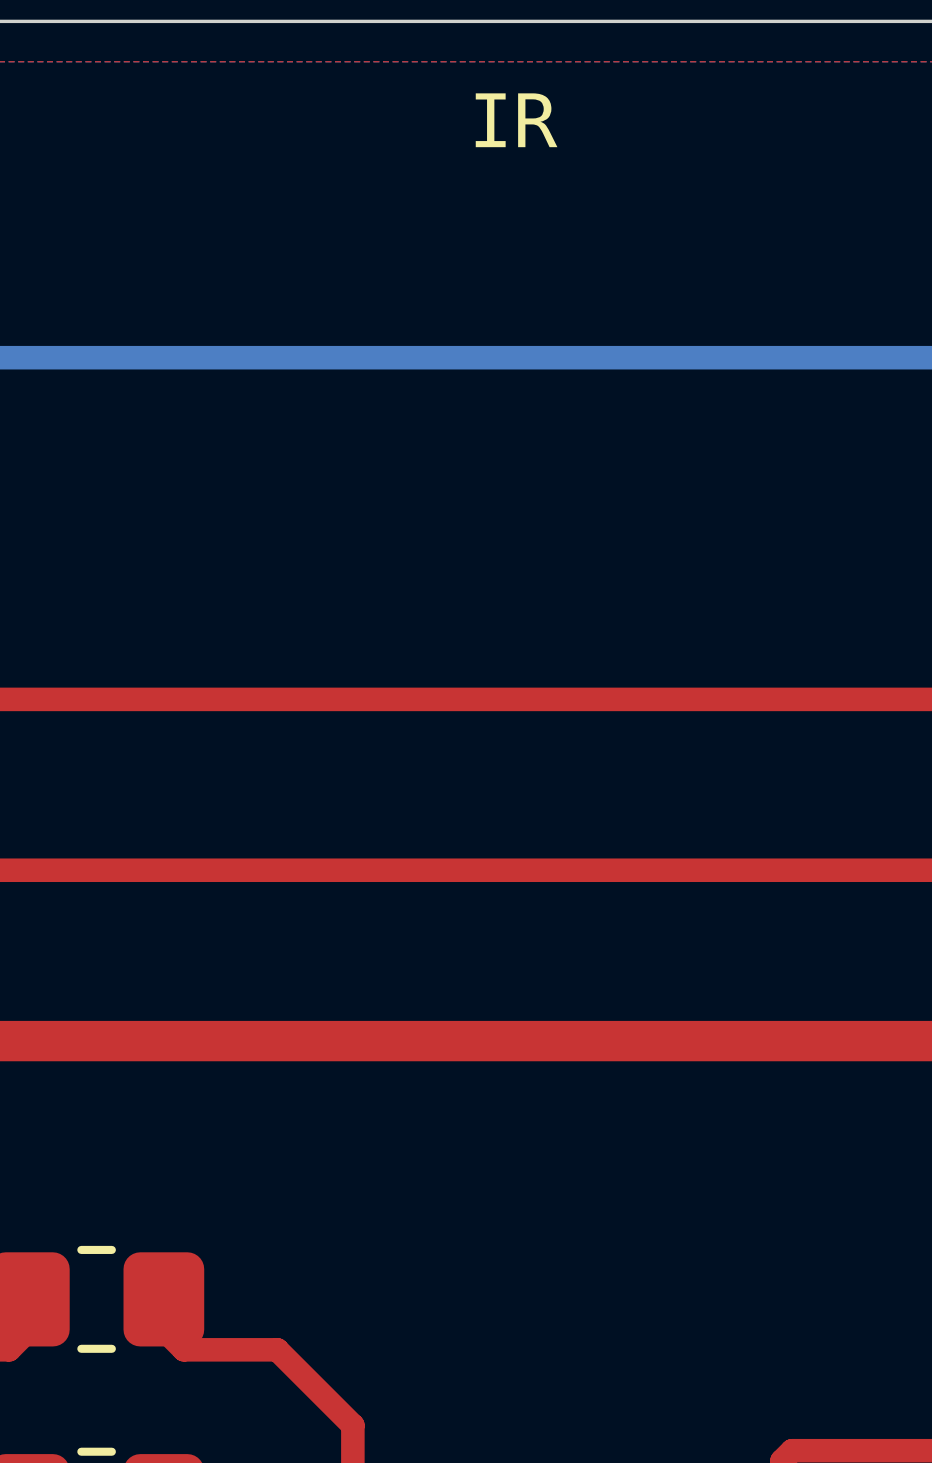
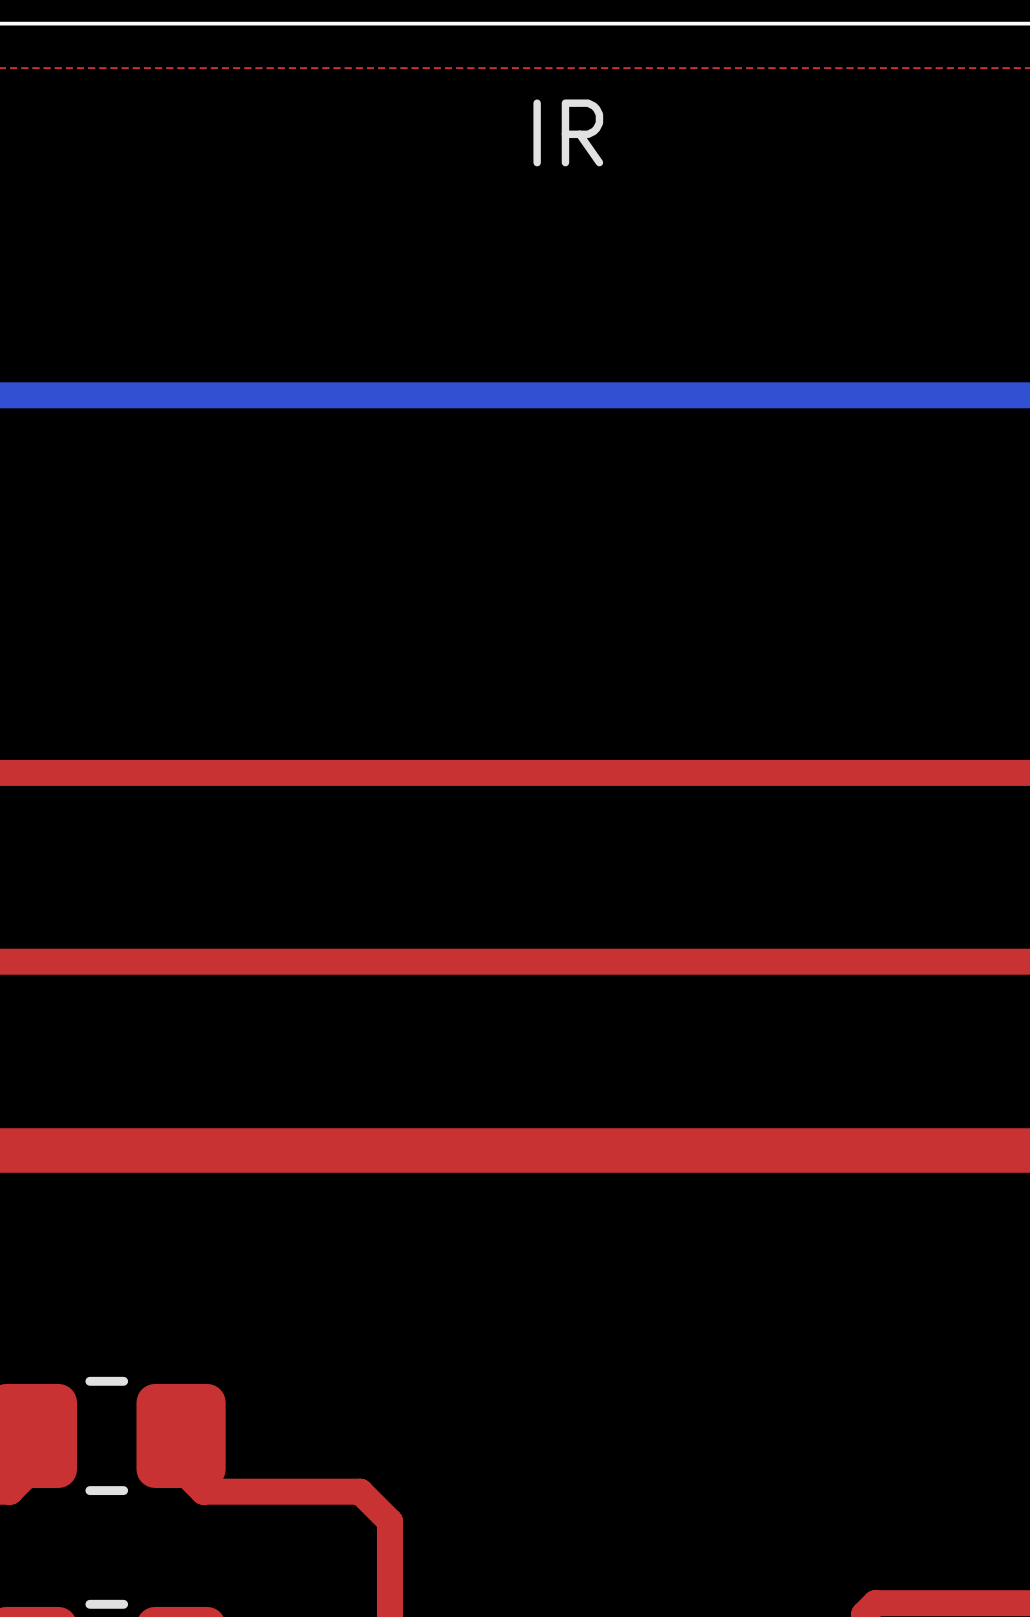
top track: (277, 1349) (352, 1425) -> (306, 1491) (360, 1491) (389, 1521) (389, 1575)

